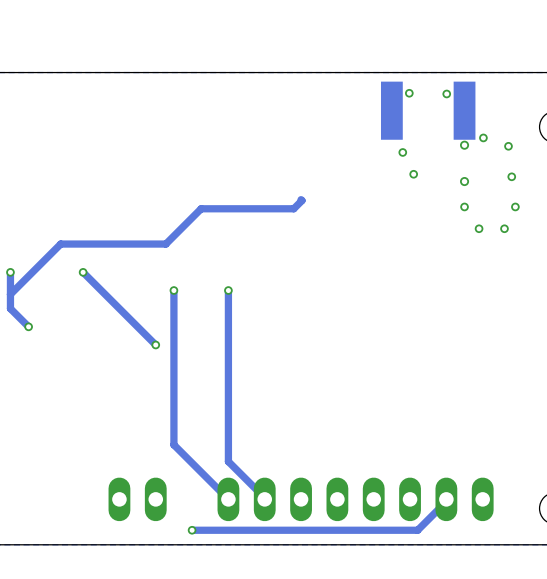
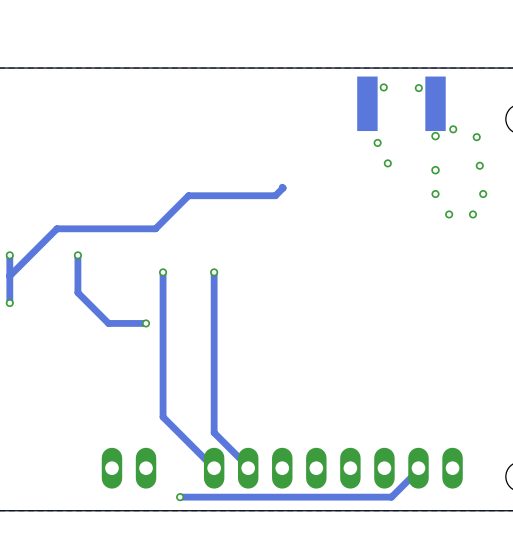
track: (83, 272) (155, 344) -> (77, 255) (77, 292) (108, 323) (146, 323)
track: (10, 308) (28, 326) -> (9, 289) (9, 303)
via position: (28, 326) -> (9, 303)

